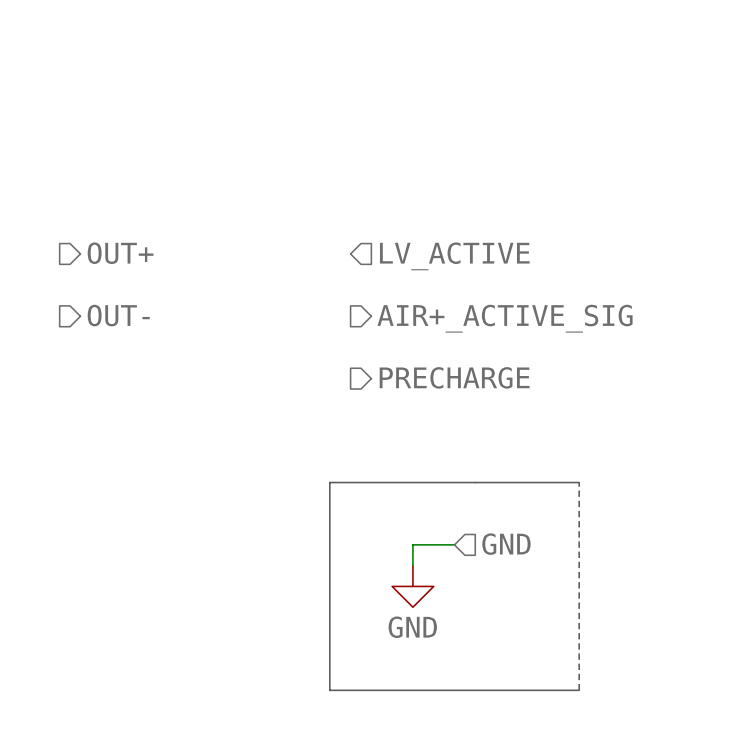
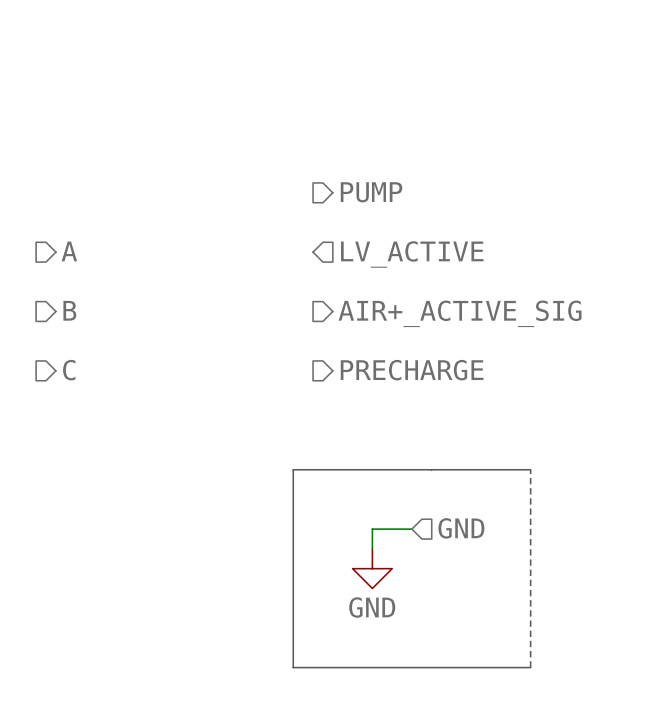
hierarchical label: none -> PUMP (371, 192)
hierarchical label: OUT+ (120, 253) -> A (69, 251)
hierarchical label: OUT- (118, 315) -> B (69, 310)
hierarchical label: none -> C (69, 370)

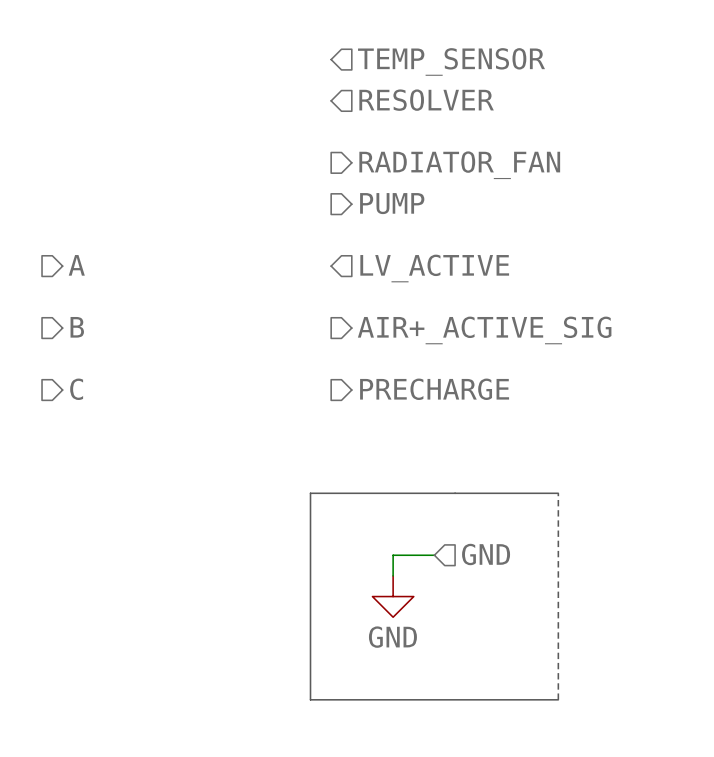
hierarchical label: none -> TEMP_SENSOR (451, 61)
hierarchical label: none -> RESOLVER (426, 100)
hierarchical label: none -> RADIATOR_FAN (459, 165)

